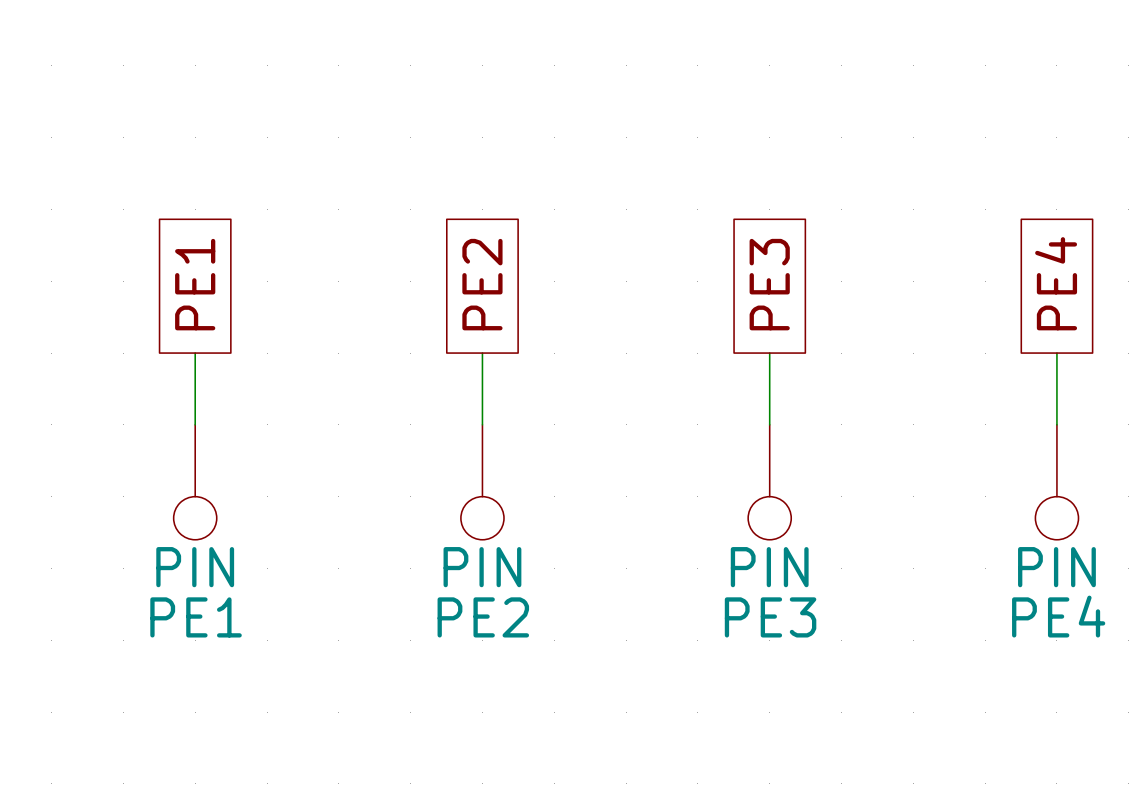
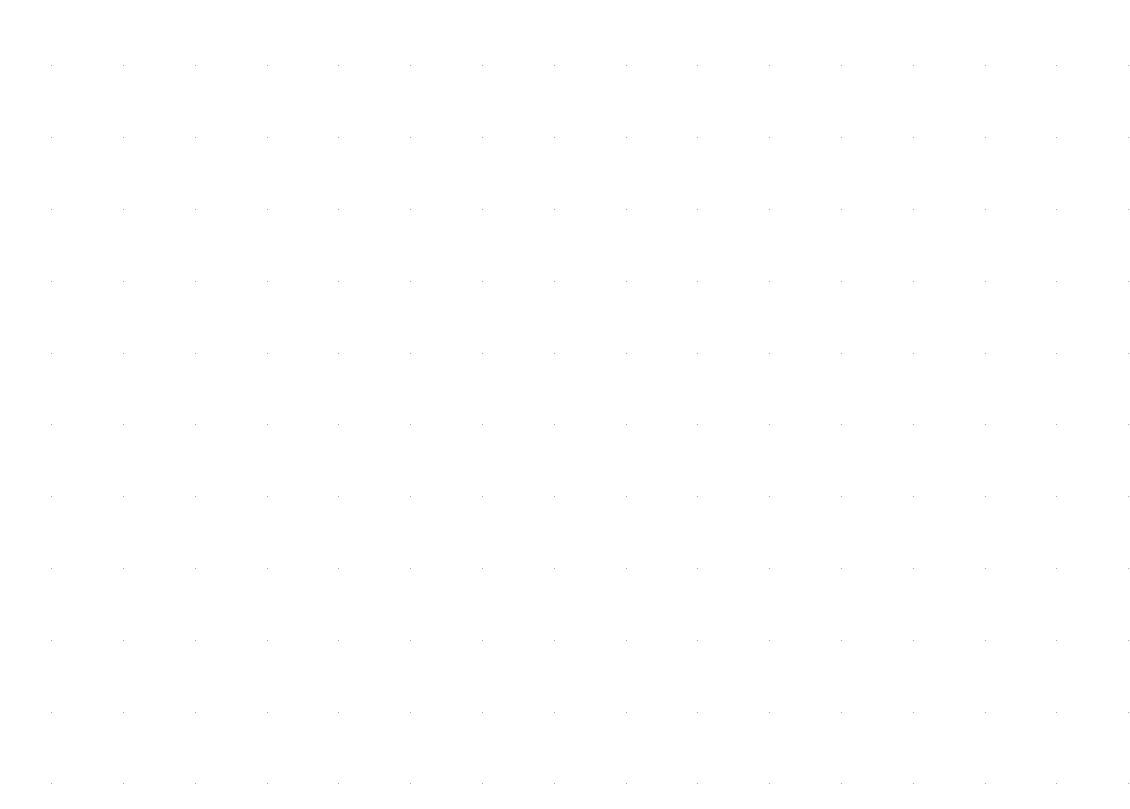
global label: PE4 (1056, 283) -> none
global label: PE1 (195, 284) -> none
global label: PE2 (482, 284) -> none
global label: PE3 (769, 284) -> none
wire: (195, 353) (195, 424) -> none
wire: (482, 353) (482, 424) -> none
wire: (769, 353) (769, 424) -> none
wire: (1056, 353) (1056, 424) -> none
PE1: PIN (195, 482) -> none
PE2: PIN (482, 482) -> none
PE3: PIN (769, 482) -> none
PE4: PIN (1056, 482) -> none

